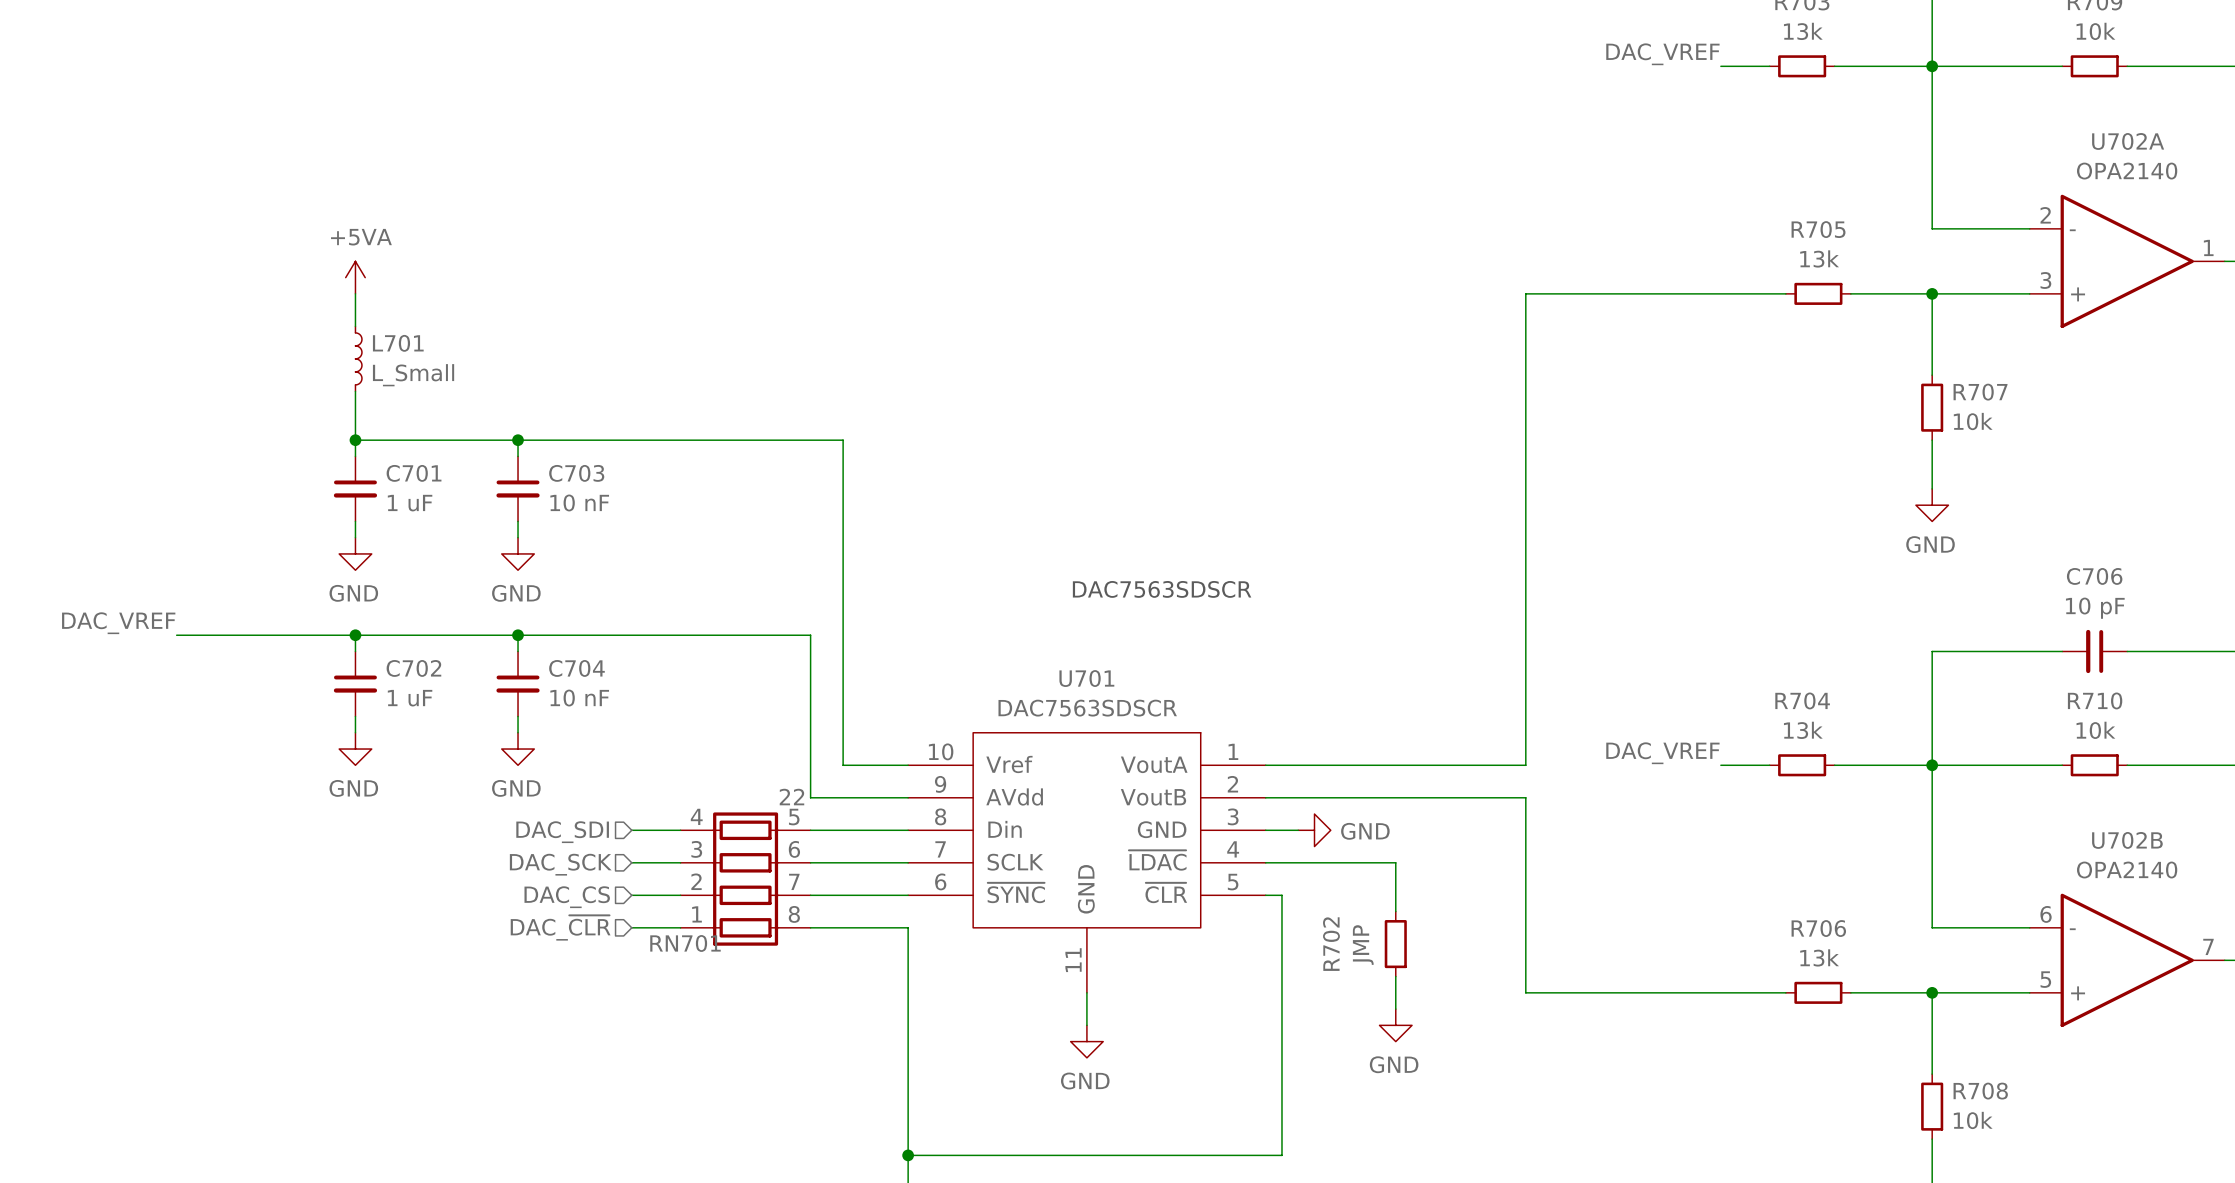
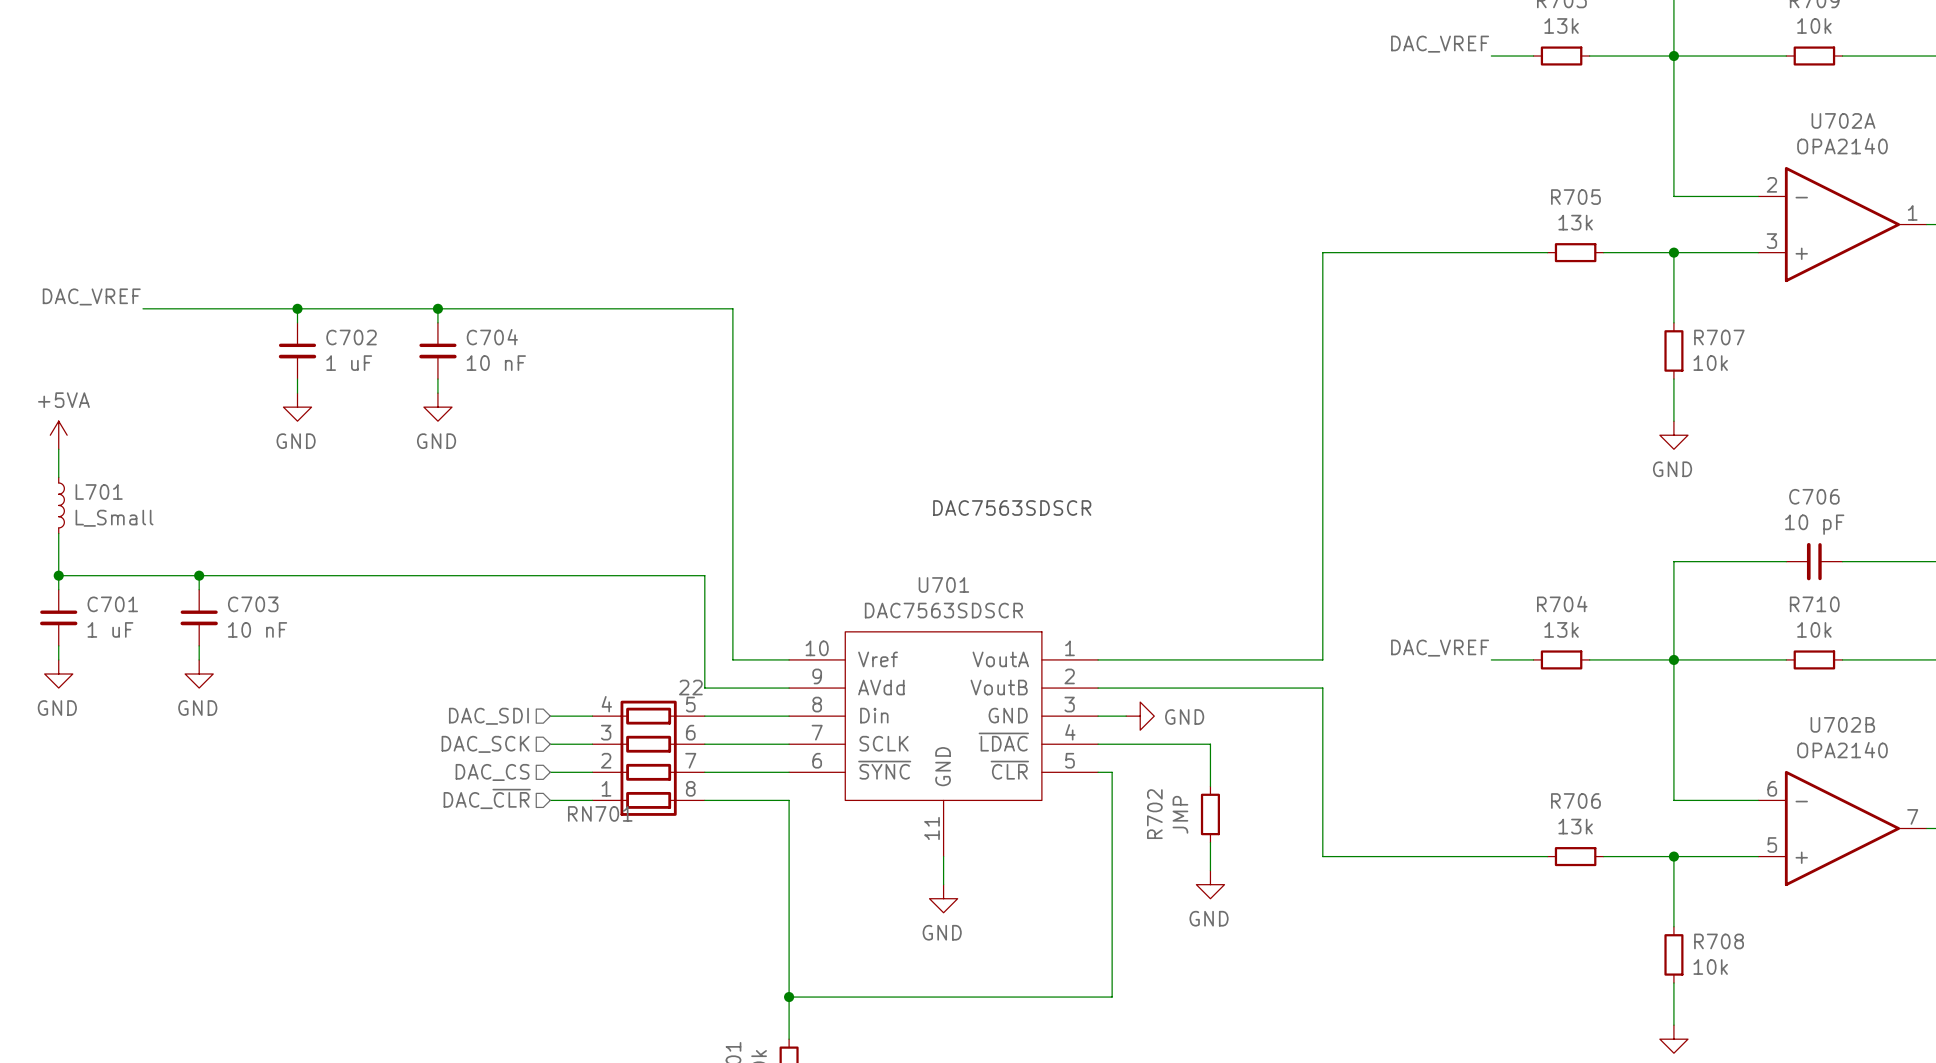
power symbol: +5VA (355, 277) -> none
wire: (355, 293) (355, 326) -> none
junction: none -> (297, 308)
L701 position: (358, 358) -> (61, 505)
junction: none -> (437, 308)
wire: (355, 391) (355, 456) -> none
wire: (355, 440) (843, 440) -> (143, 308) (732, 308) (732, 379)
junction: (355, 440) -> none
wire: (518, 440) (518, 456) -> none
junction: (518, 440) -> none
C701 position: (355, 488) -> (58, 617)
C703 position: (518, 488) -> (199, 617)
power symbol: none -> +5VA (58, 435)
wire: none -> (58, 449) (58, 477)
wire: (355, 521) (355, 537) -> (199, 575) (199, 589)
wire: (518, 521) (518, 537) -> none
power symbol position: GND (355, 553) -> GND (297, 407)
power symbol position: GND (518, 553) -> GND (437, 407)
wire: none -> (58, 533) (58, 589)
label position: DAC_VREF (118, 623) -> DAC_VREF (91, 296)
wire: (176, 635) (810, 635) (810, 667) -> (58, 575) (704, 575)
wire: (355, 635) (355, 651) -> (297, 308) (297, 322)
junction: (355, 635) -> none
wire: (518, 635) (518, 651) -> (437, 308) (437, 322)
junction: (518, 635) -> none
junction: none -> (58, 575)
junction: none -> (199, 575)
C702 position: (355, 684) -> (297, 350)
C704 position: (518, 684) -> (437, 350)
wire: (355, 716) (355, 732) -> (297, 379) (297, 393)
wire: (518, 716) (518, 732) -> (437, 379) (437, 393)
wire: none -> (58, 645) (58, 659)
wire: none -> (199, 645) (199, 659)
power symbol: GND (355, 749) -> none
power symbol: GND (518, 749) -> none
power symbol: none -> GND (58, 674)
power symbol: none -> GND (199, 674)

